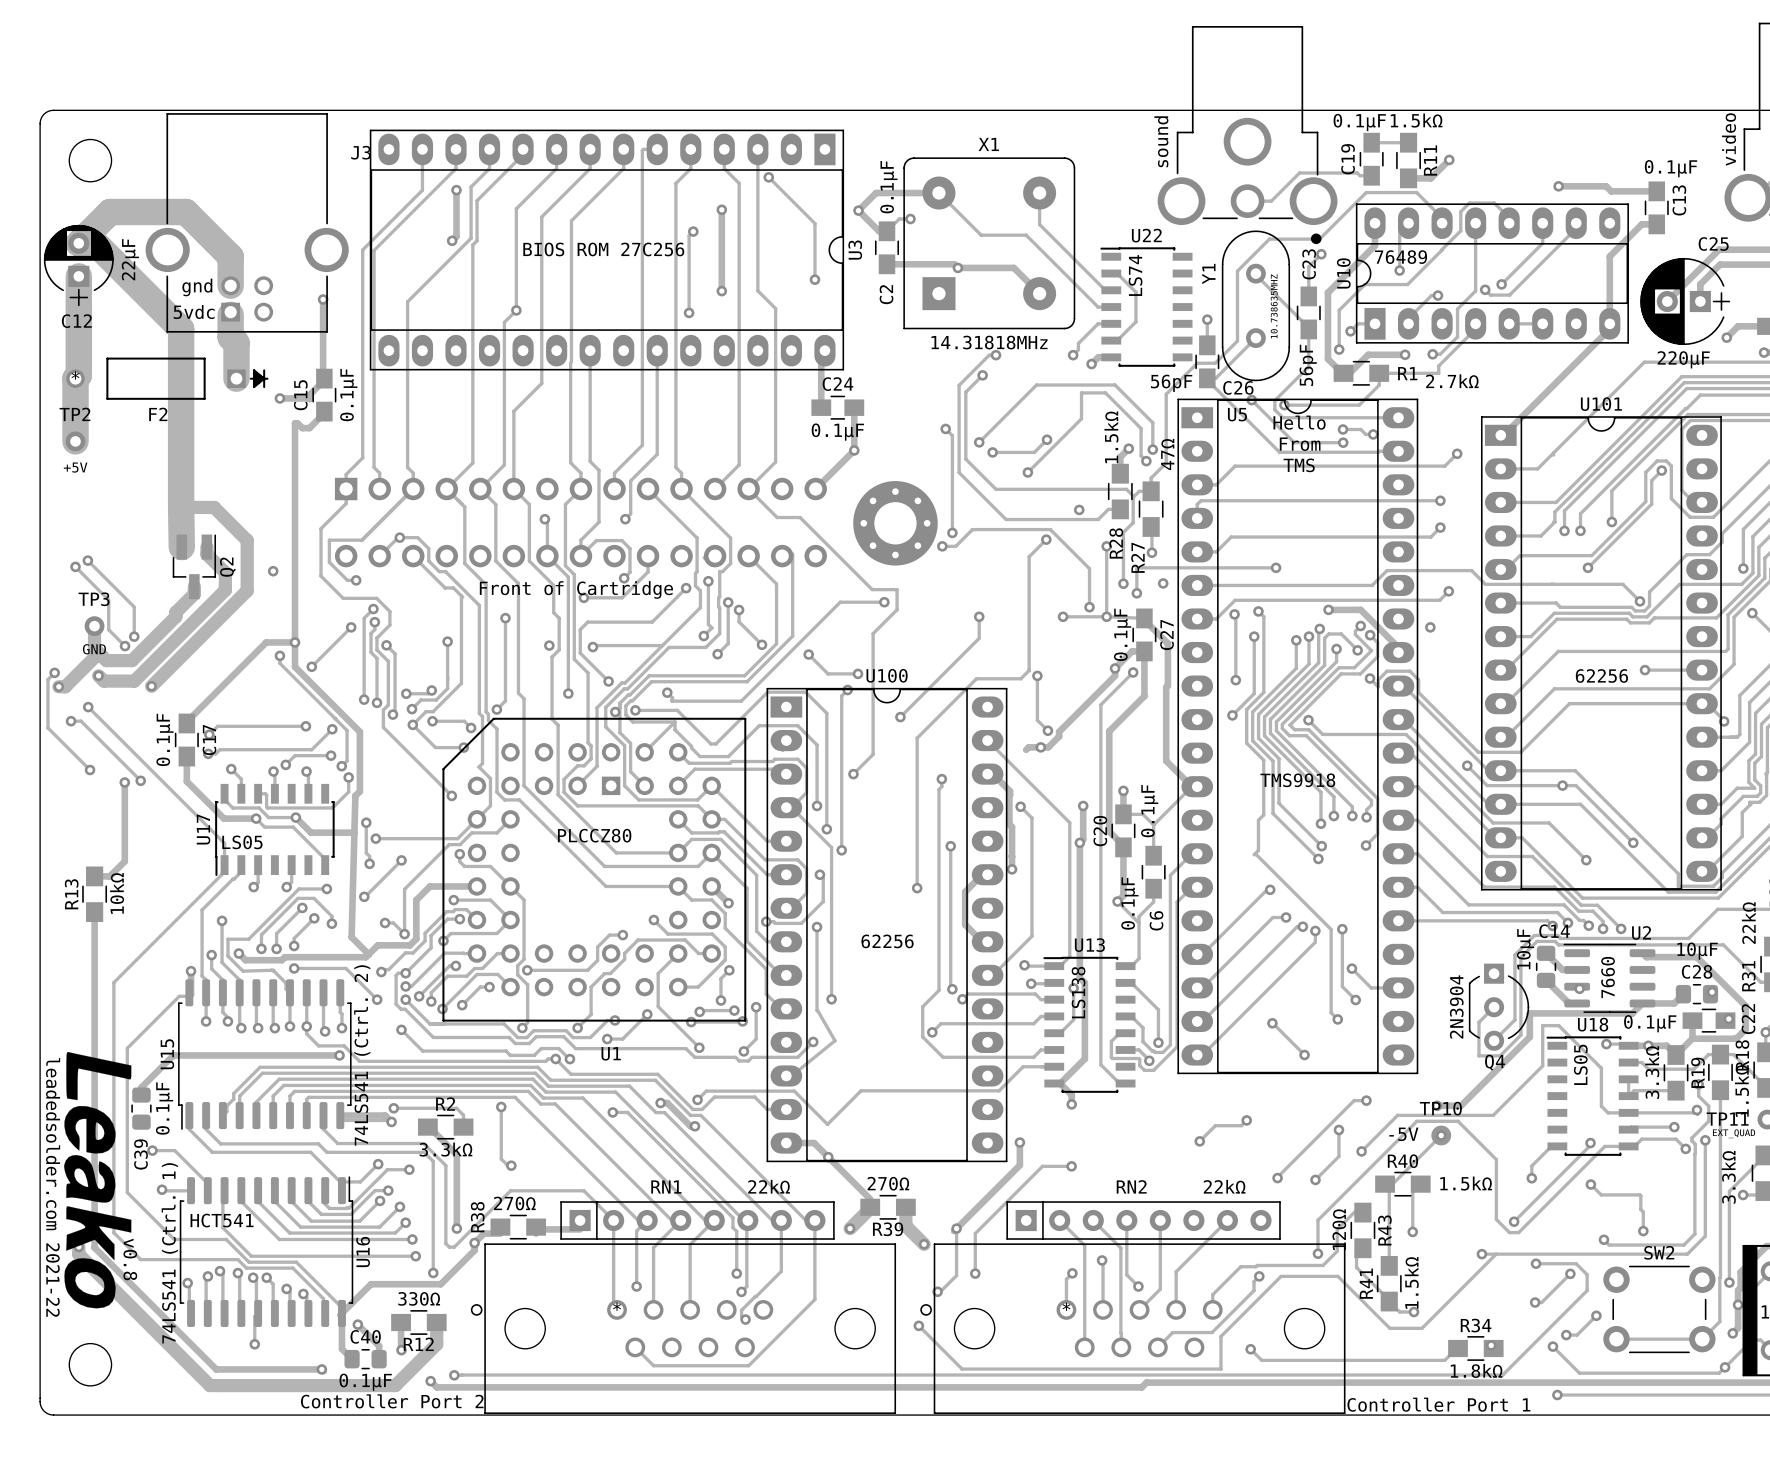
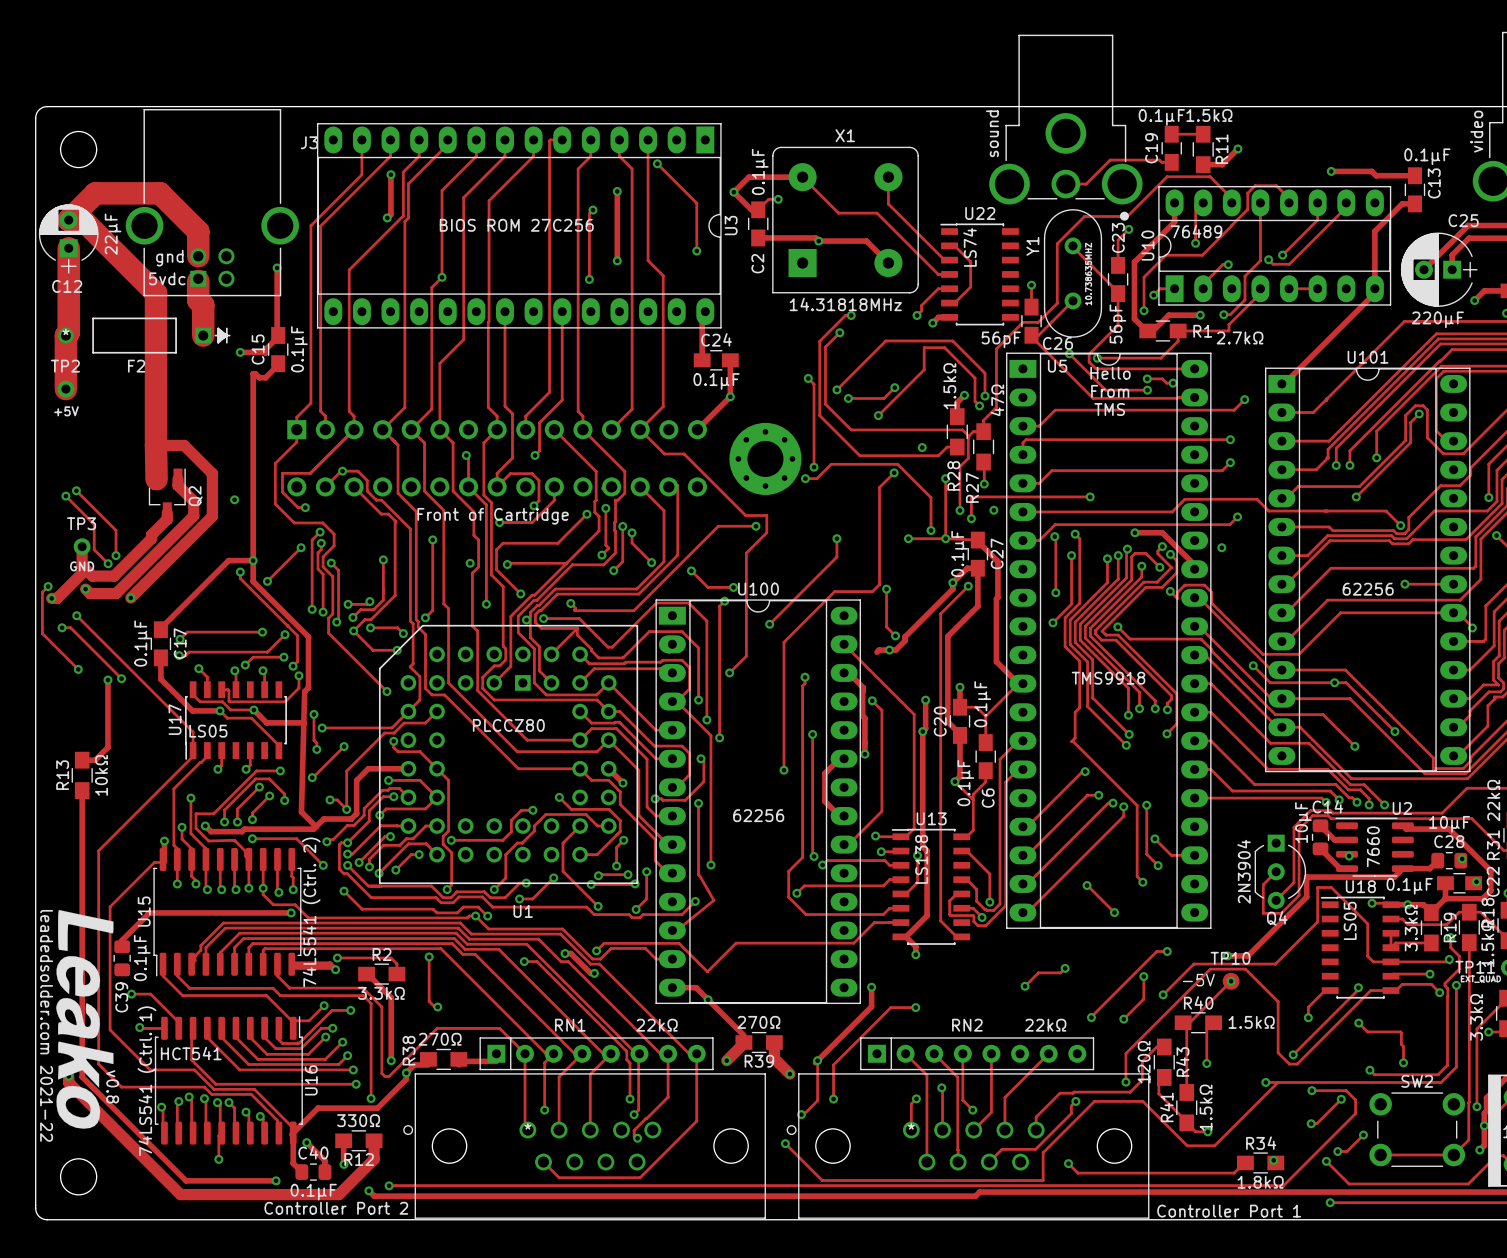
via: (1725, 1367) -> none

